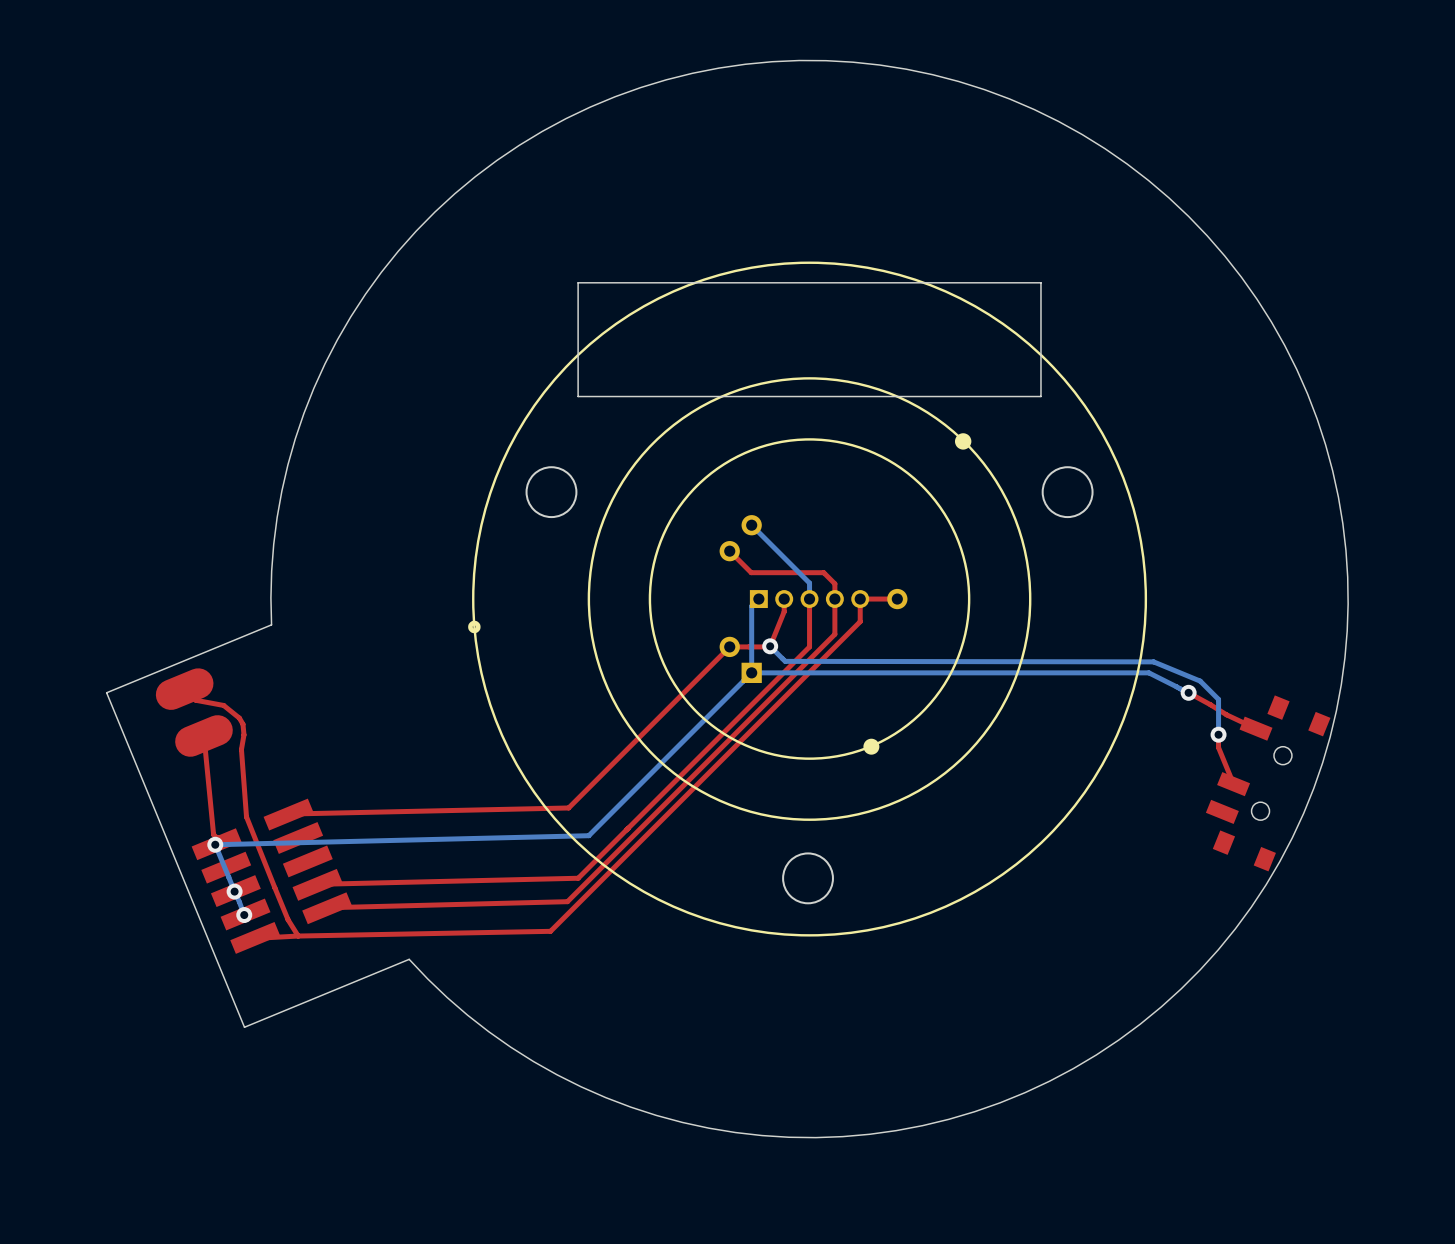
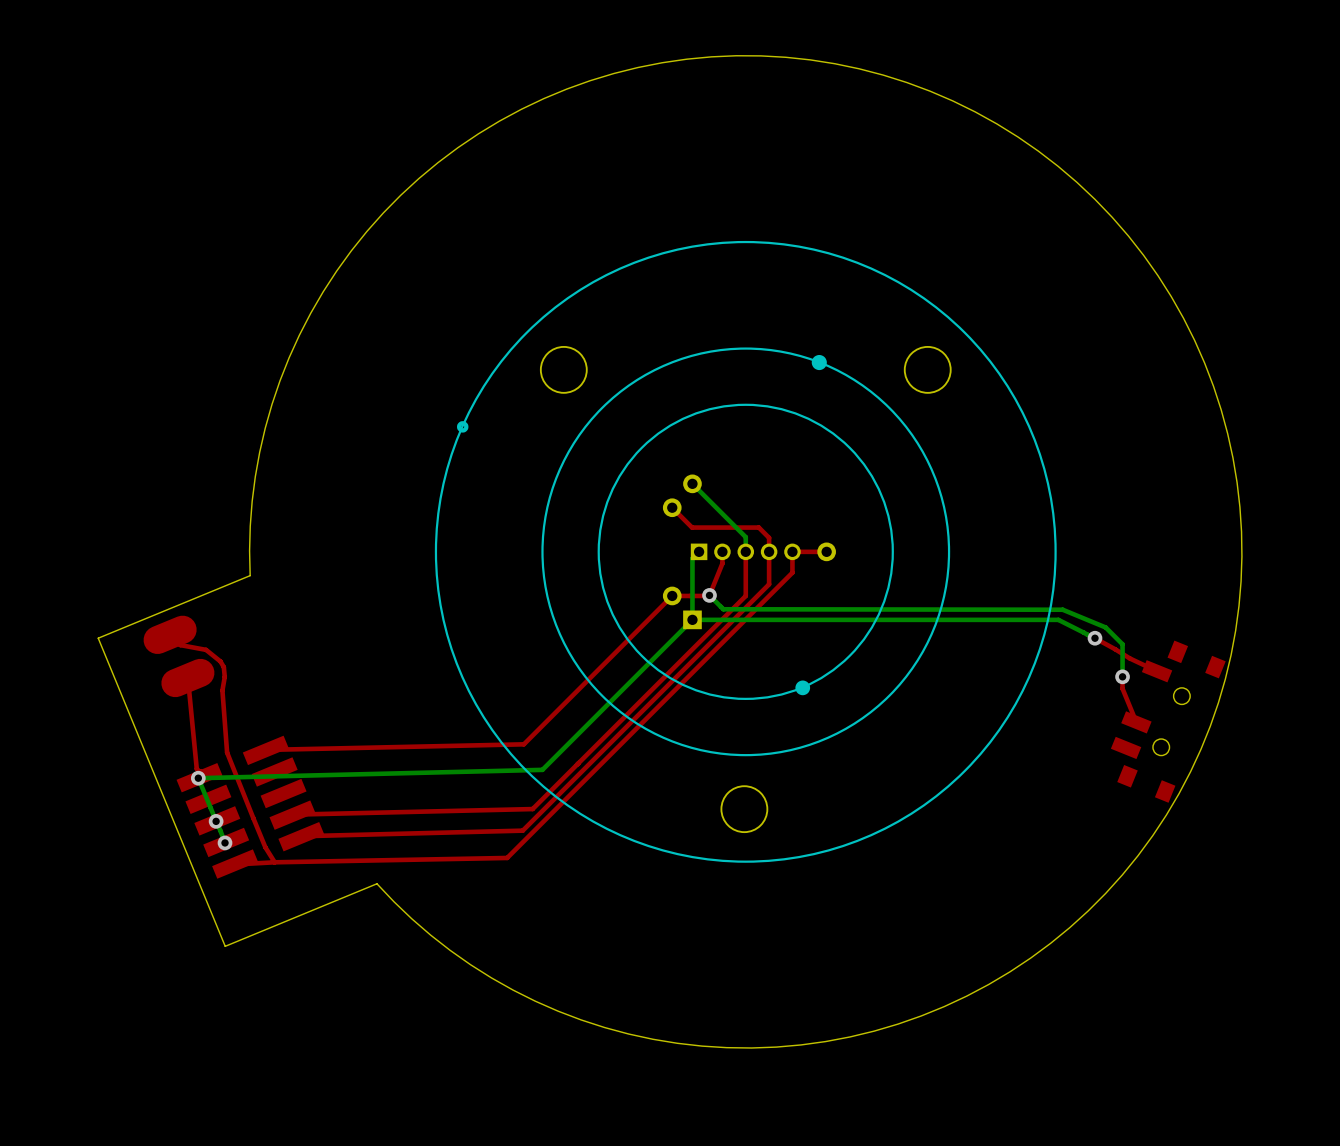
board edge: (1040, 282) (1040, 396) (578, 396) (578, 282) (1040, 282) -> none
drawing position: (963, 441) -> (819, 362)
round board edge position: (551, 492) -> (563, 369)
round board edge position: (1067, 492) -> (927, 369)
drawing position: (474, 626) -> (462, 426)

